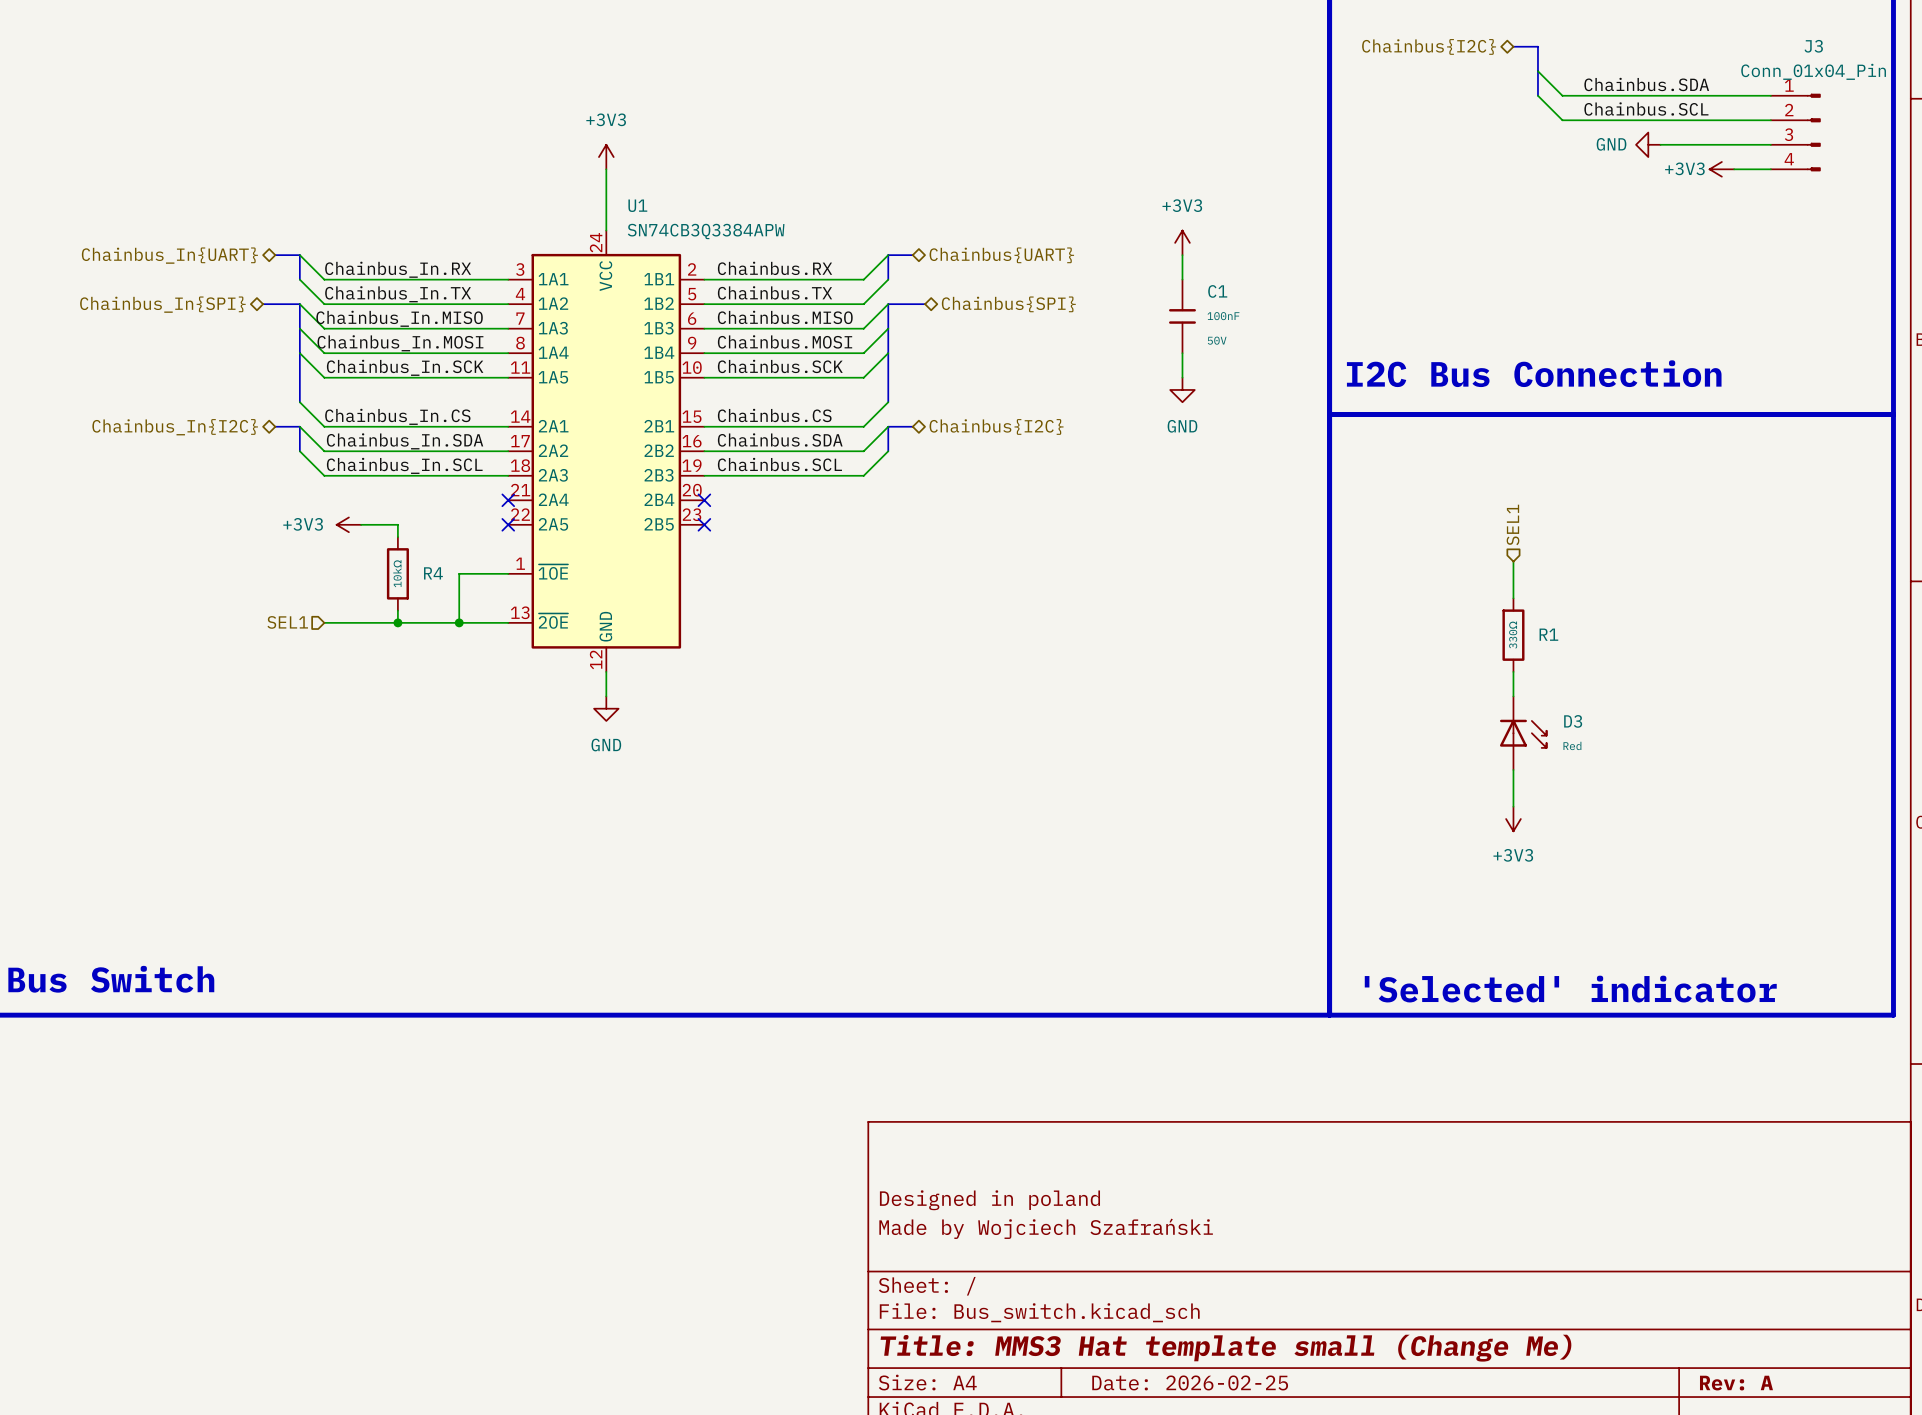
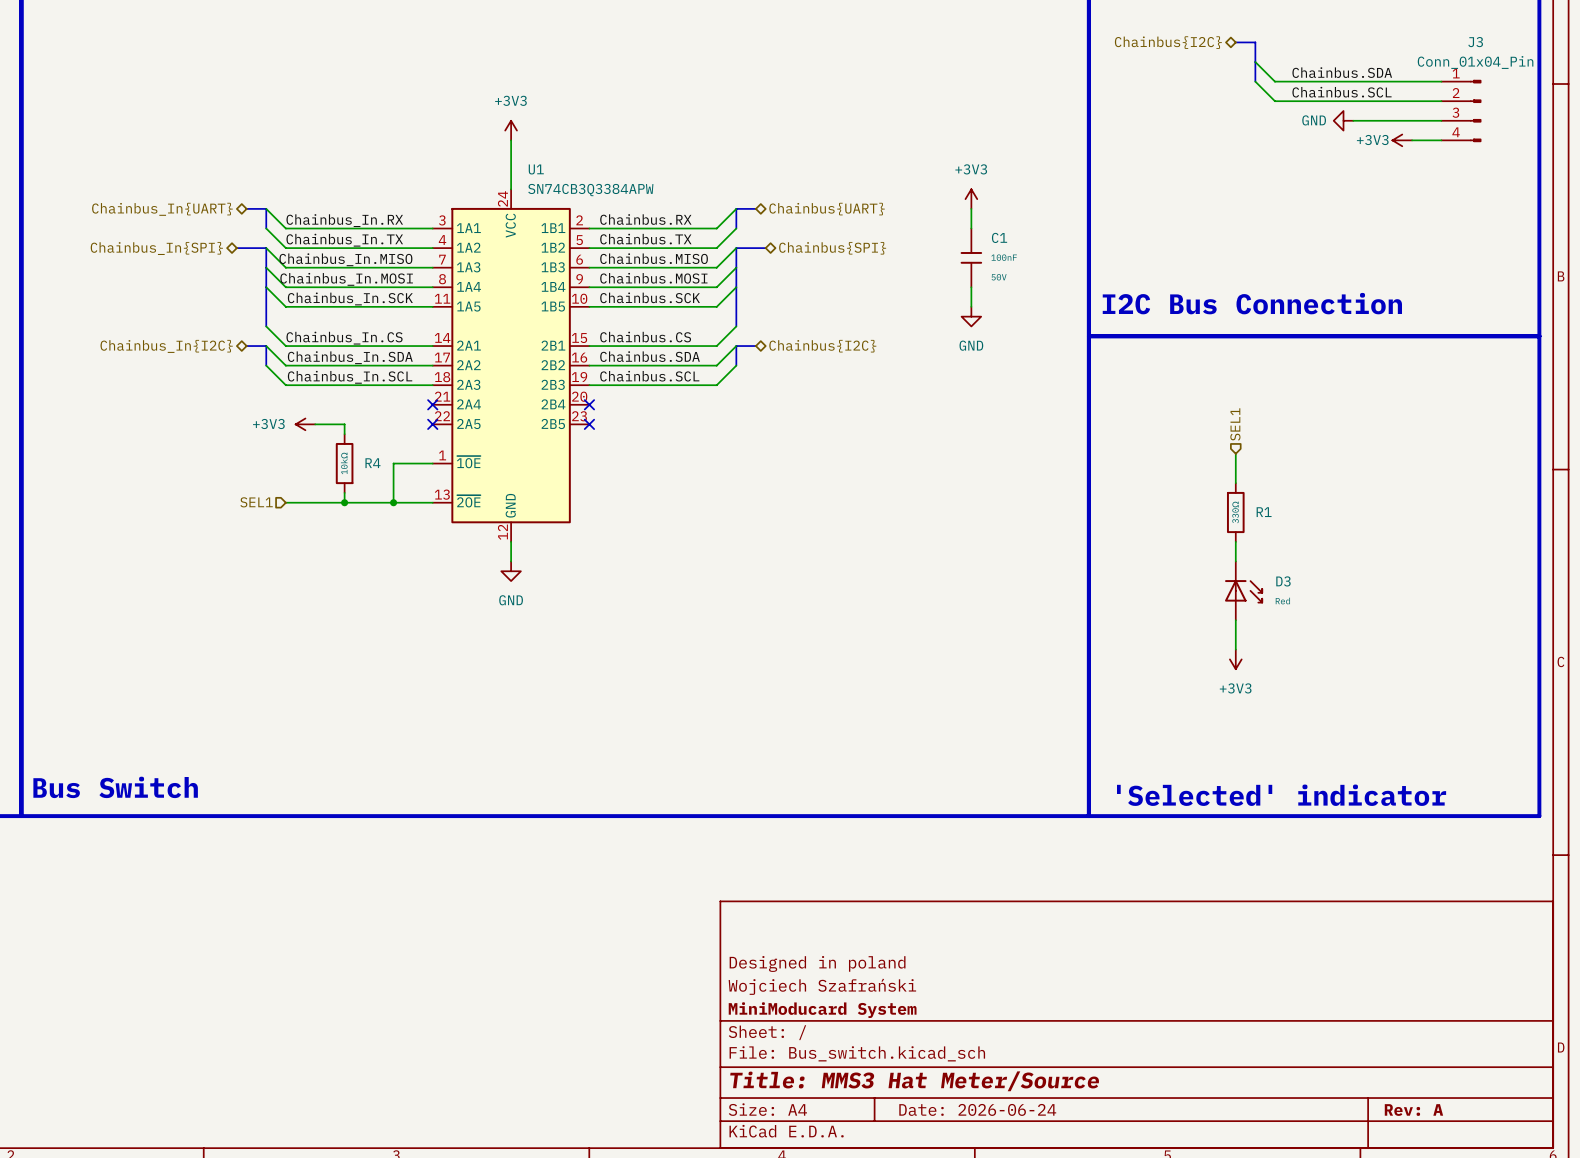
title block: Made by Wojciech Szafrański (1046, 1228) -> Wojciech Szafrański (822, 986)
title block: none -> MiniModucard System (822, 1010)
title block: Title: MMS3 Hat template small (Change Me) (1226, 1348) -> Title: MMS3 Hat Meter/Source (914, 1081)
title block: Date: 2026-02-25 (1190, 1382) -> Date: 2026-06-24 (977, 1109)

